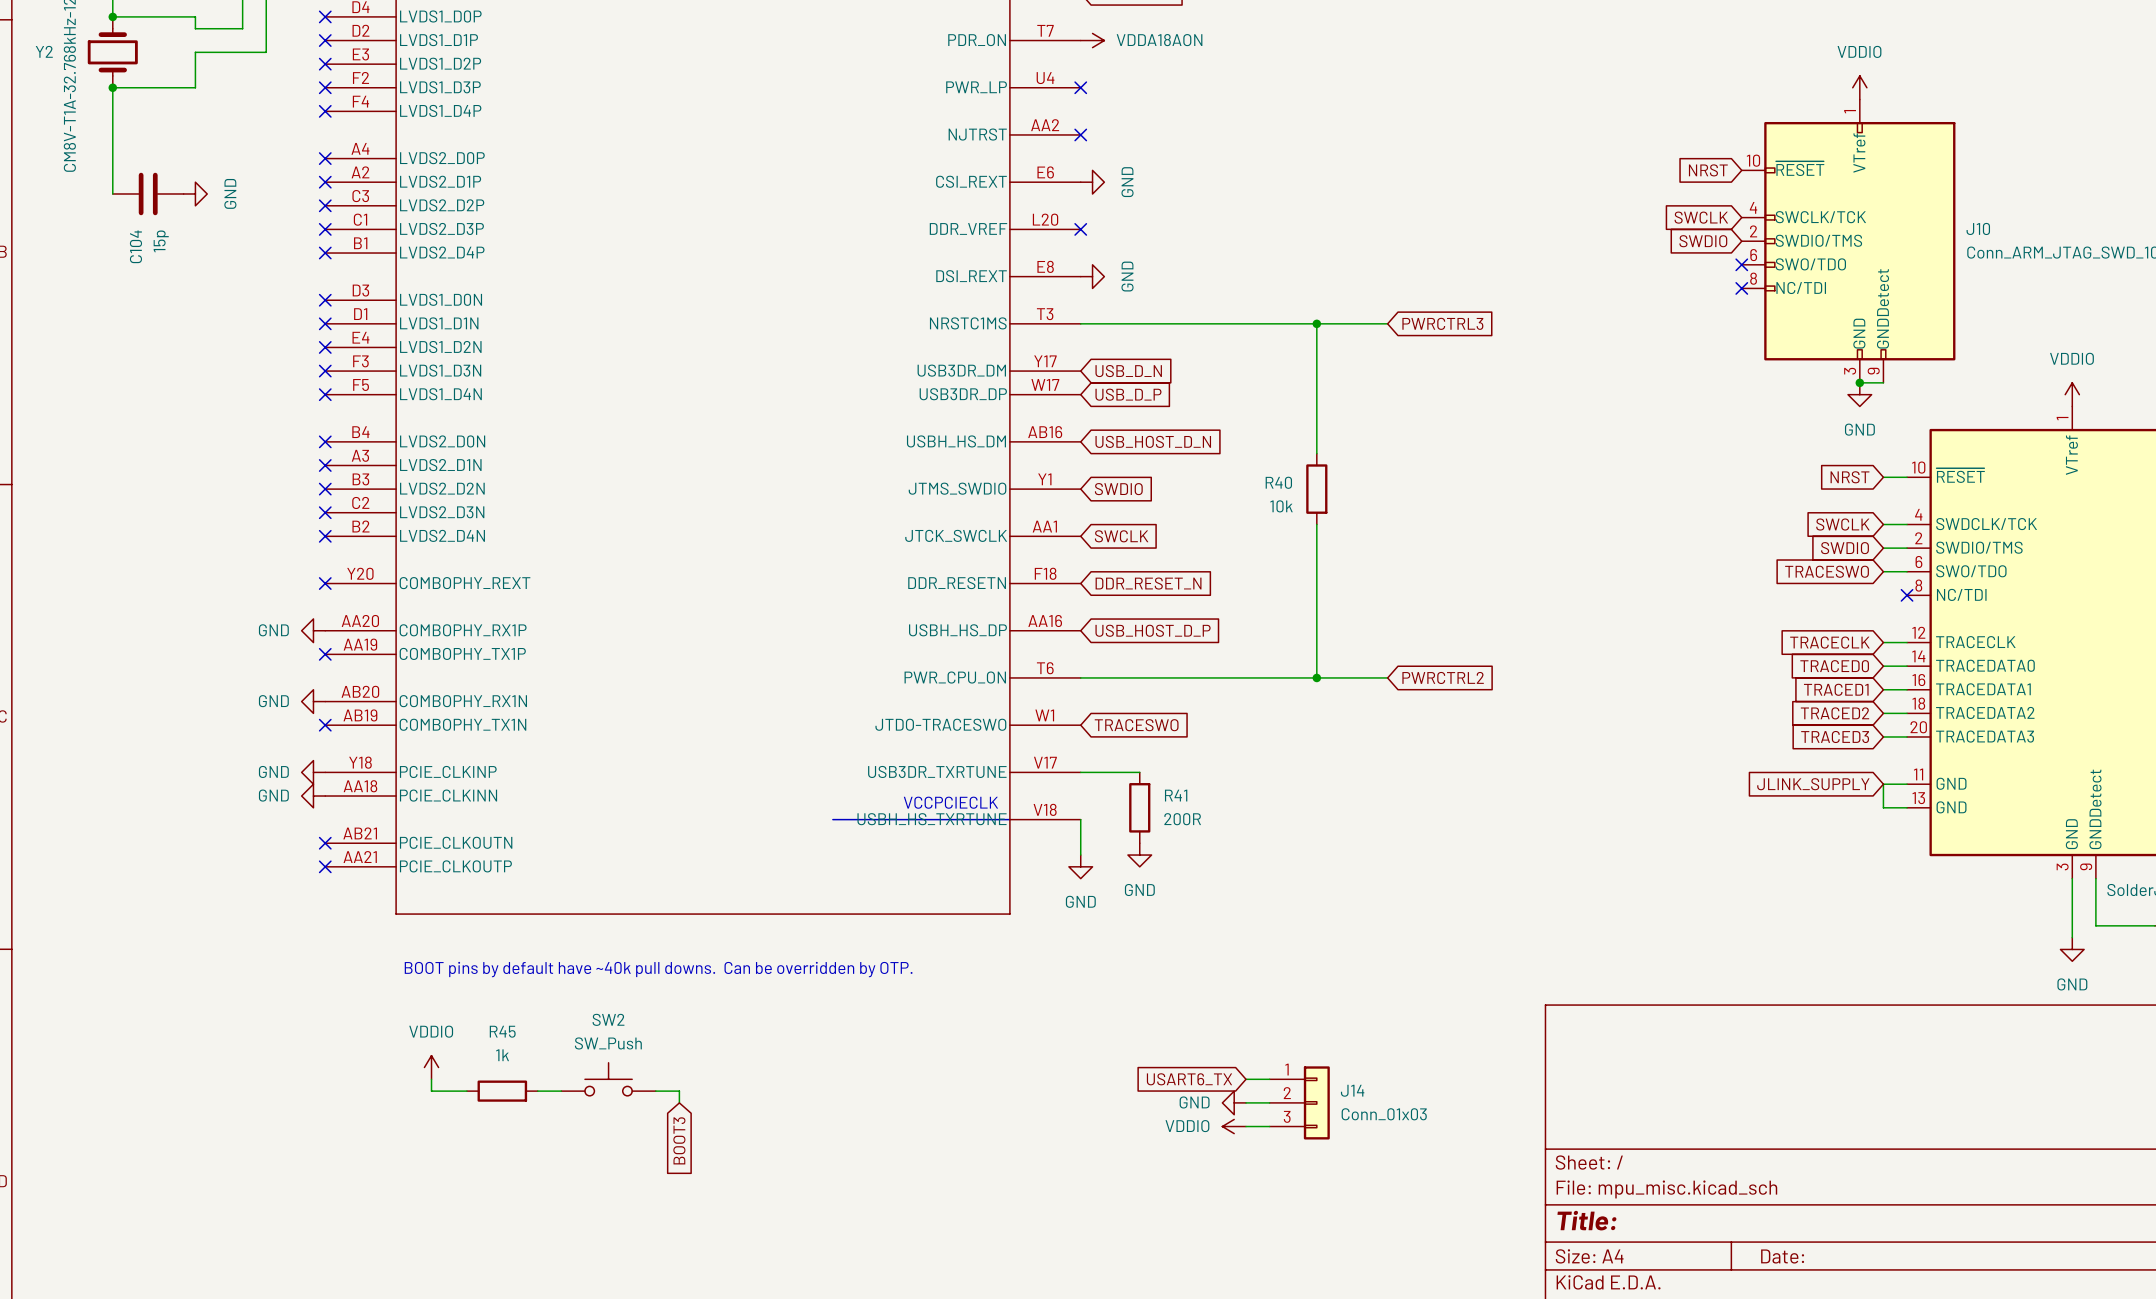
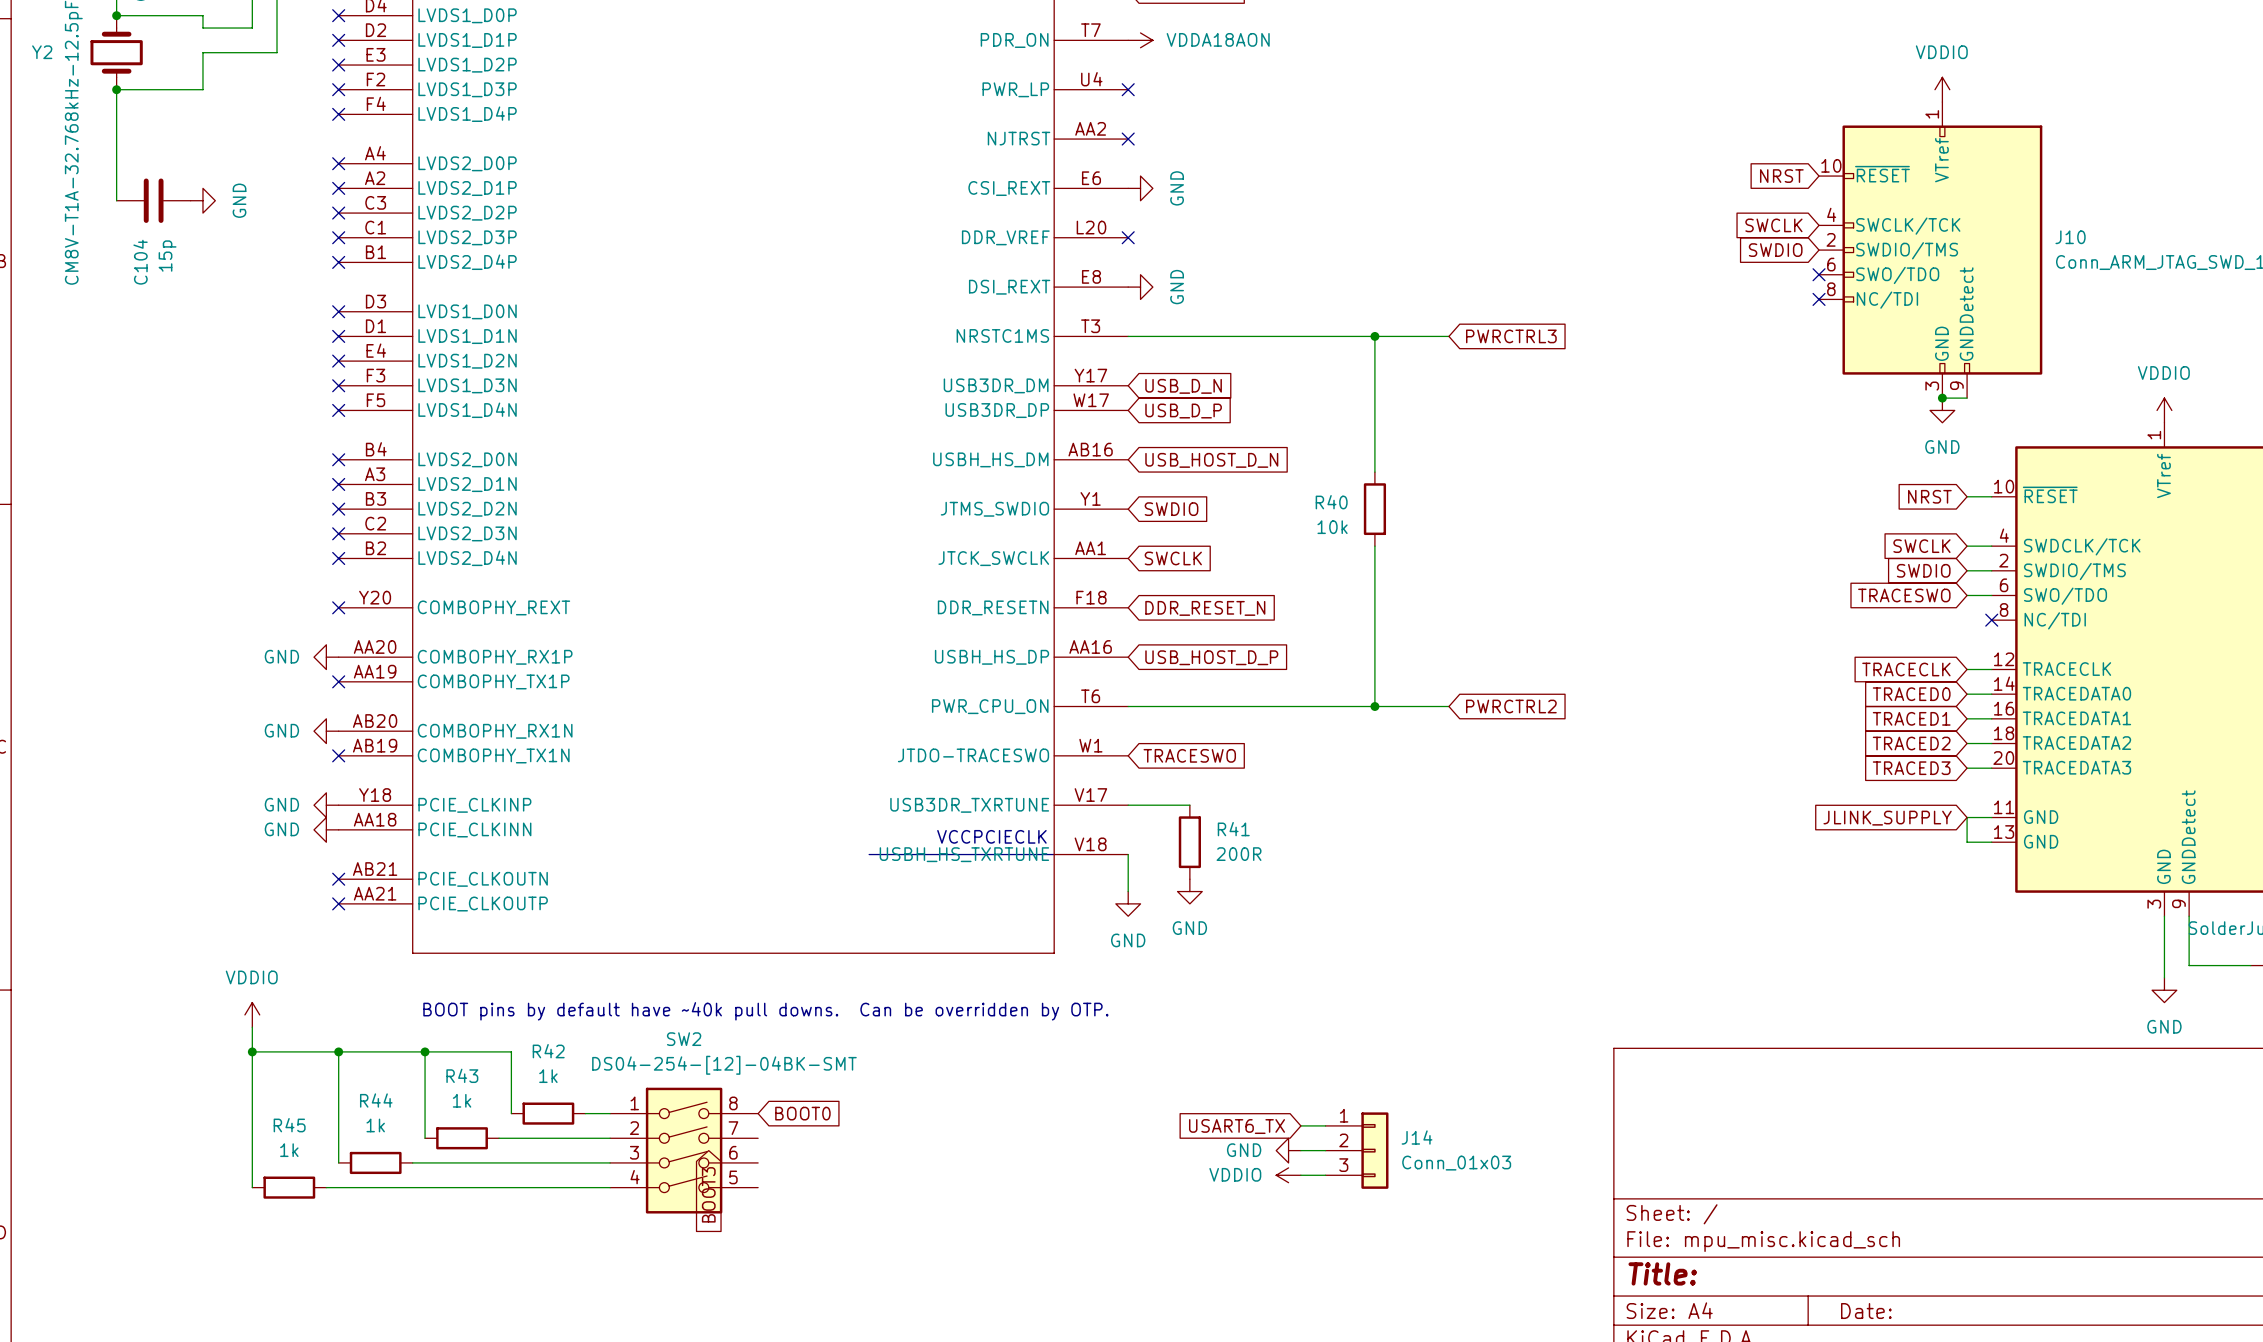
wire: none -> (252, 1027) (252, 1187)
wire: none -> (252, 1051) (511, 1051) (511, 1113)
junction: none -> (252, 1051)
wire: none -> (338, 1051) (338, 1162)
junction: none -> (338, 1051)
wire: none -> (425, 1051) (425, 1138)
junction: none -> (425, 1051)
SW2 name position: SW2 (608, 1019) -> SW2 (684, 1039)
SW2 value: SW_Push (608, 1043) -> DS04-254-[12]-04BK-SMT (724, 1065)
SW2 symbol: [561, 1062, 656, 1096] -> [610, 1087, 759, 1214]
power symbol position: VDDIO (431, 1067) -> VDDIO (252, 1014)
R42: none -> 1k (548, 1113)
wire: none -> (585, 1113) (610, 1113)
global label: none -> BOOT0 (802, 1113)
wire: (431, 1079) (431, 1091) (466, 1091) -> none
R43: none -> 1k (462, 1138)
wire: none -> (499, 1138) (560, 1138)
R45 position: (502, 1091) -> (289, 1187)
R44: none -> 1k (375, 1162)
wire: none -> (412, 1162) (610, 1162)
wire: none -> (326, 1187) (610, 1187)

